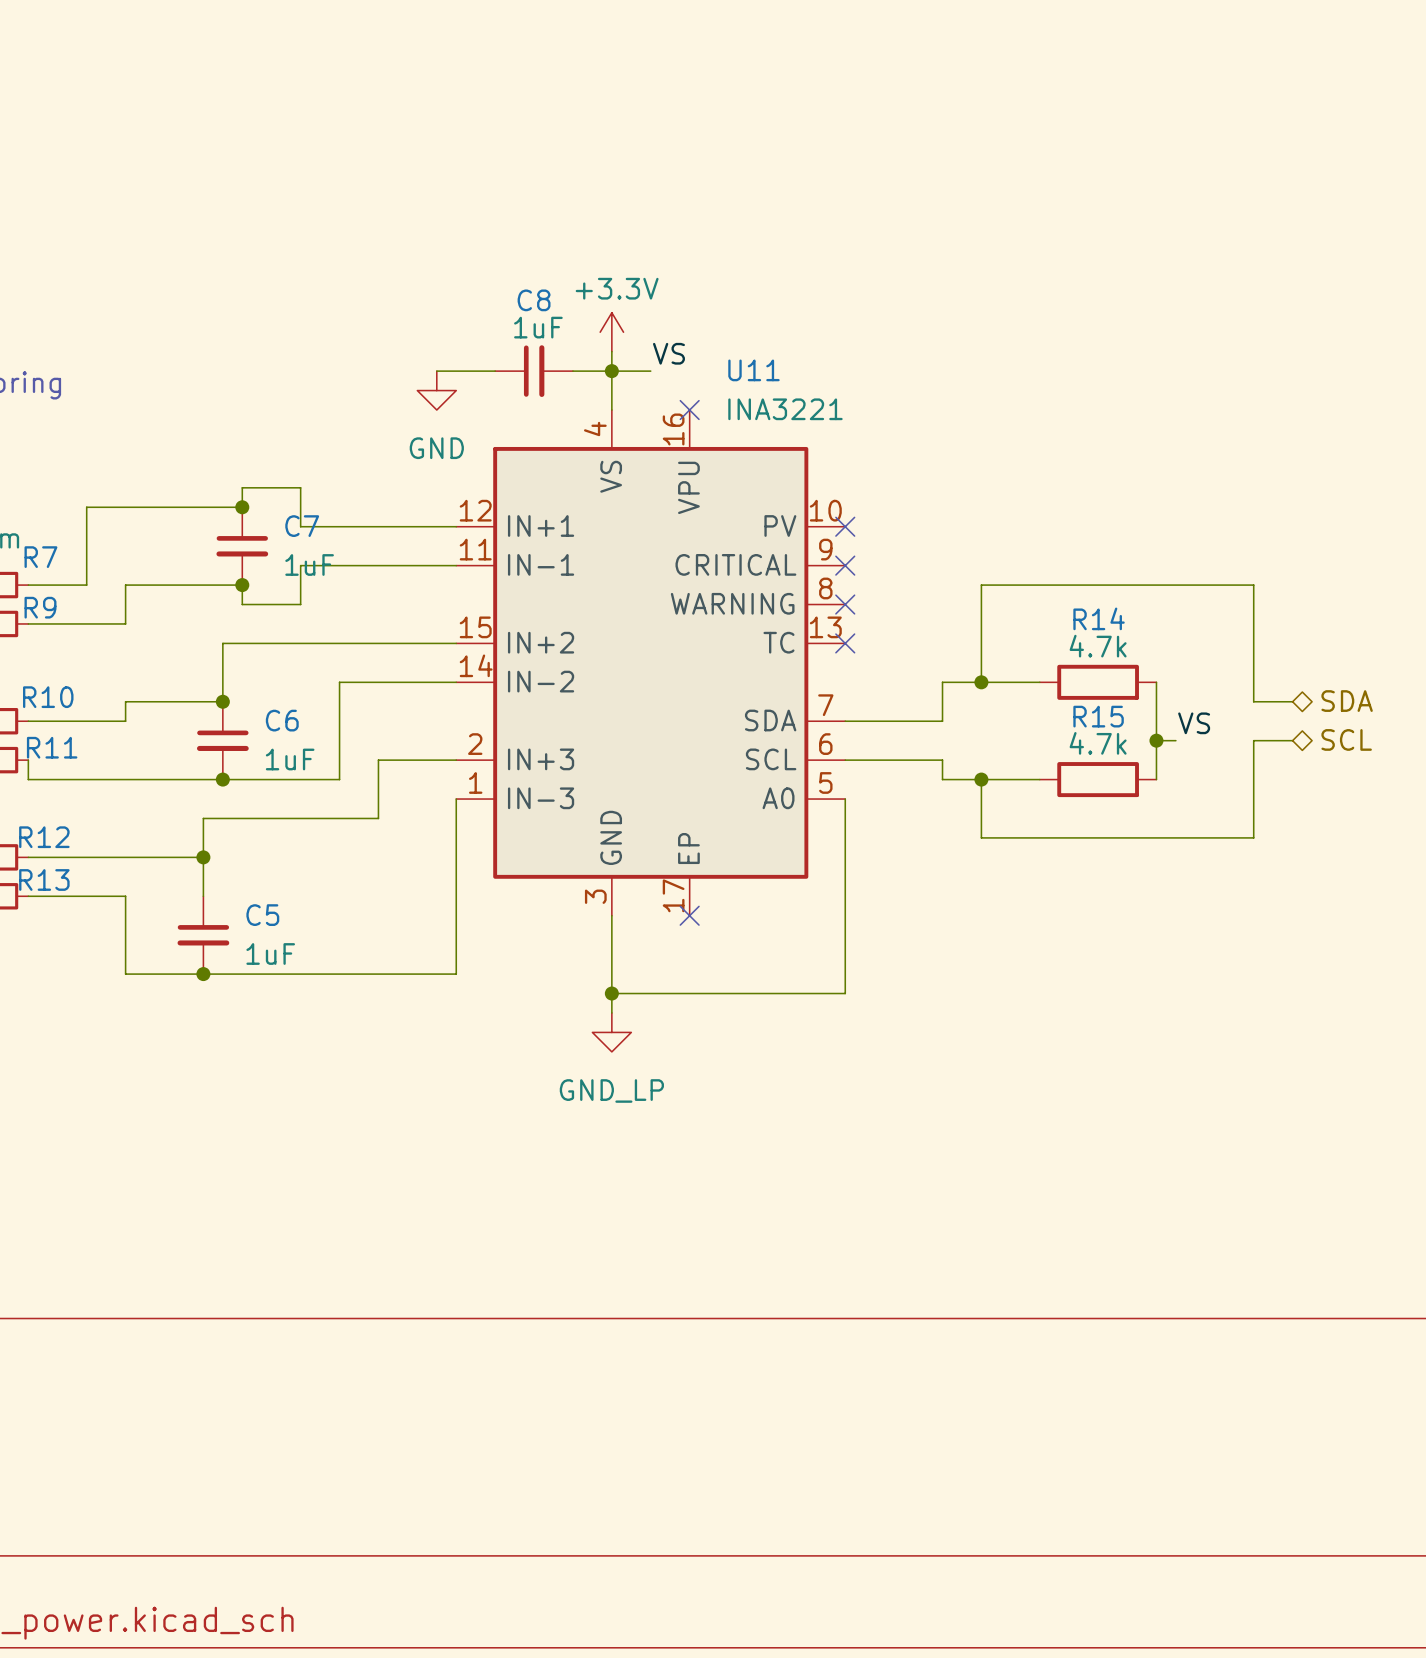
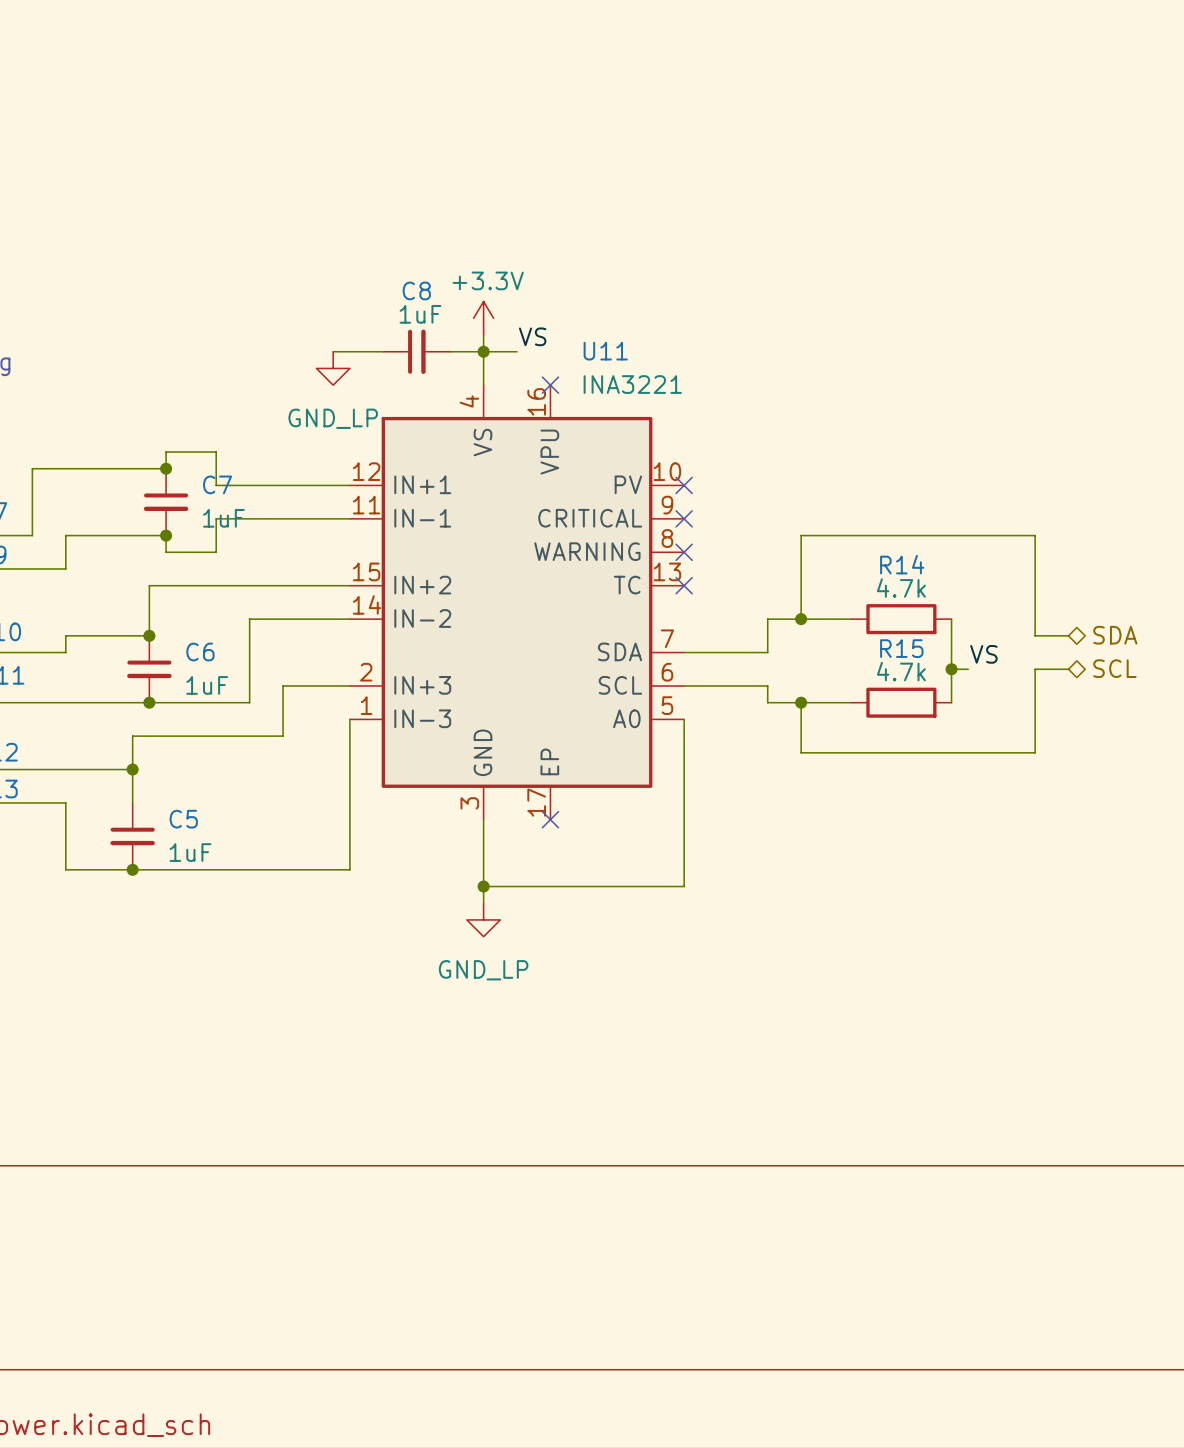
power symbol: GND (436, 390) -> GND_LP (333, 368)

